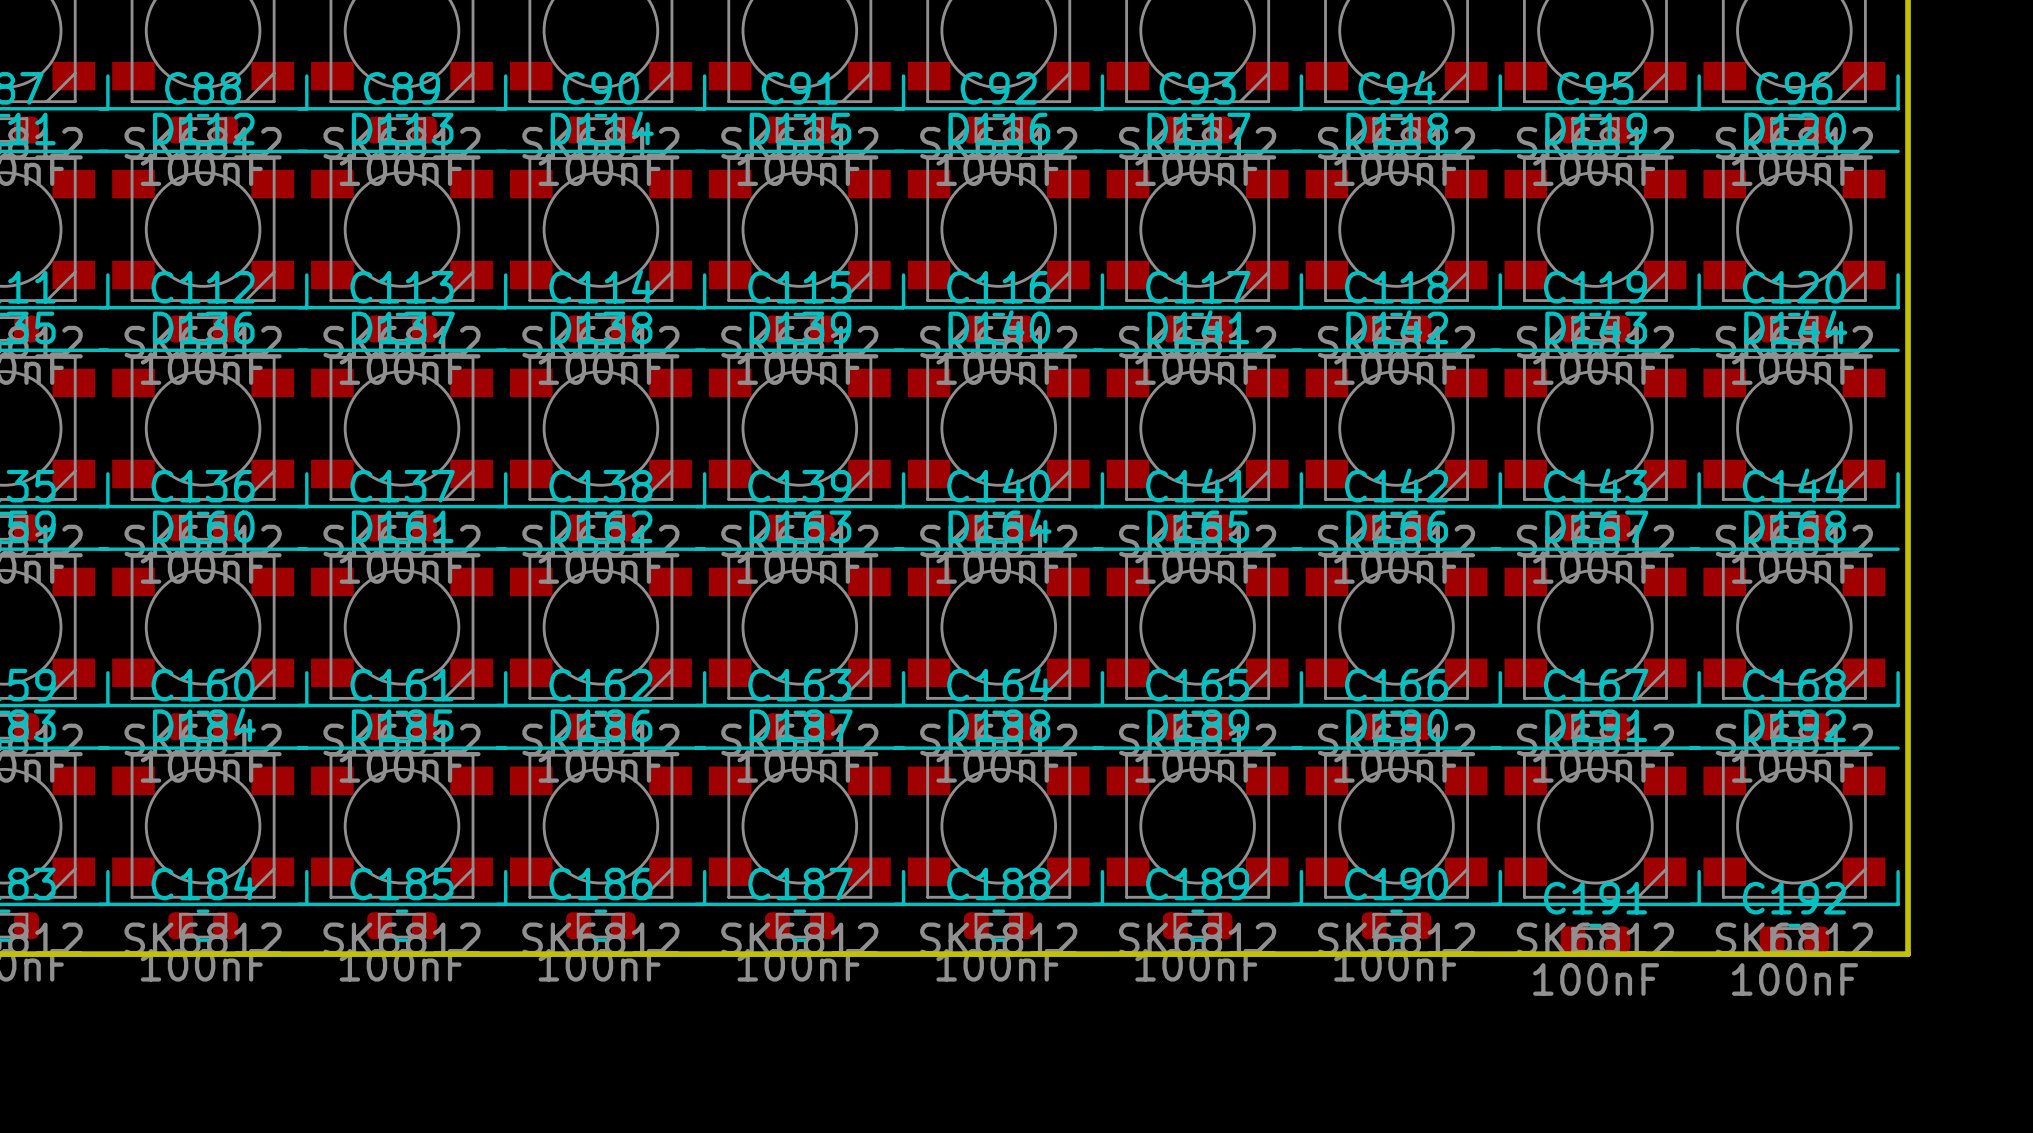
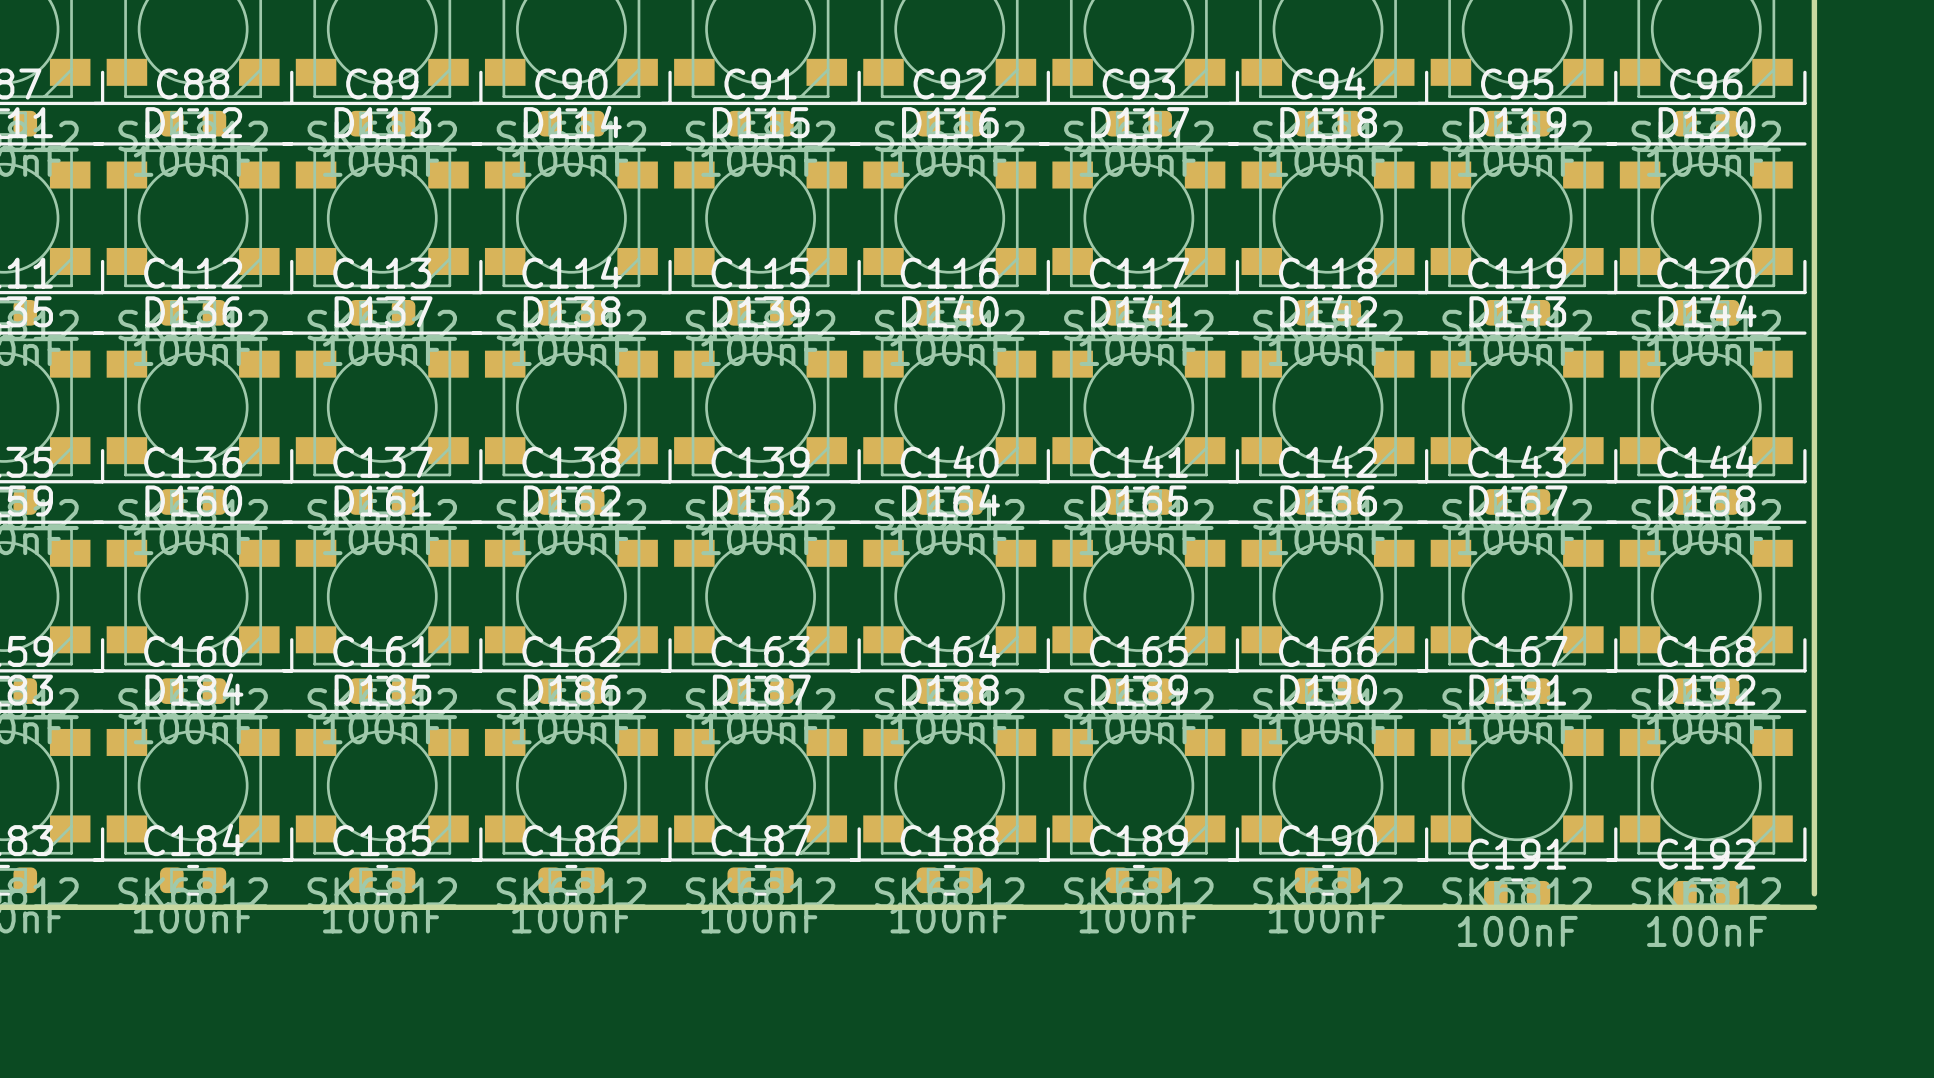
board edge: (1908, 939) (1908, 954) -> none

